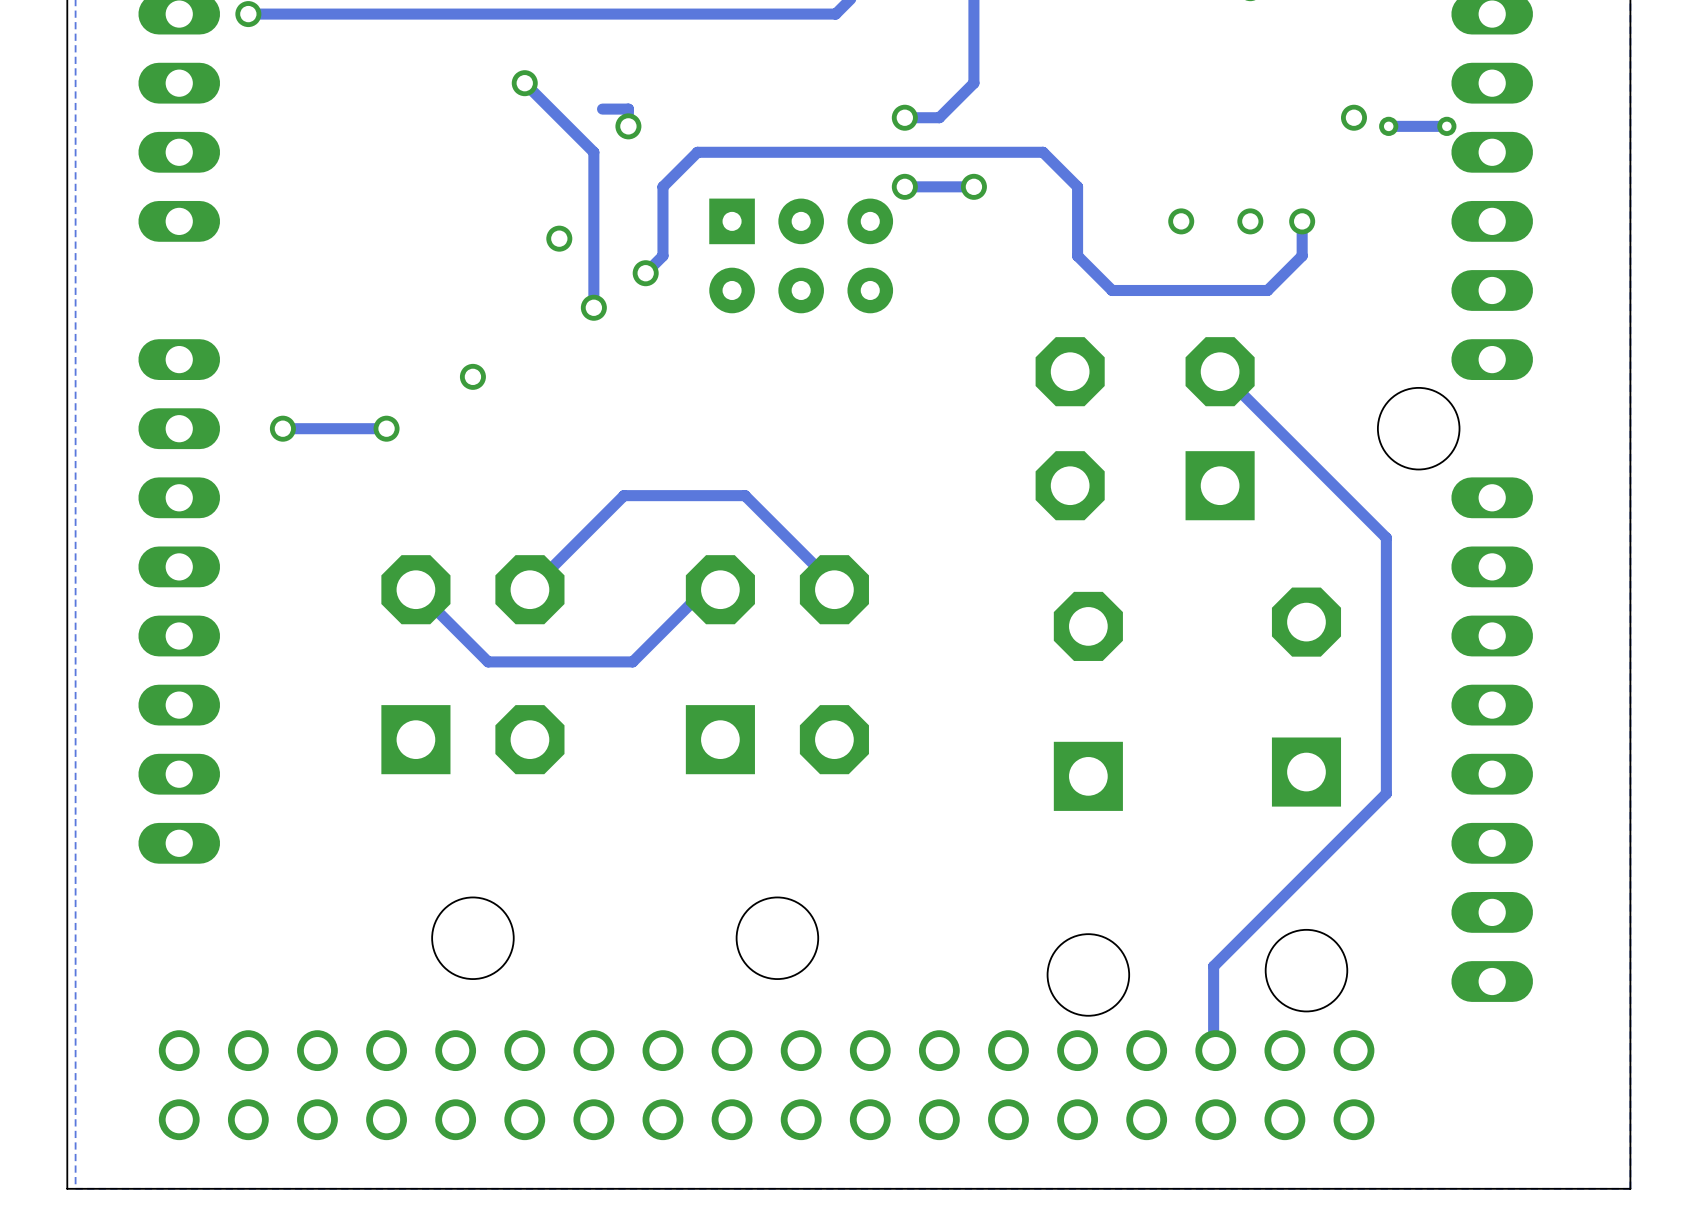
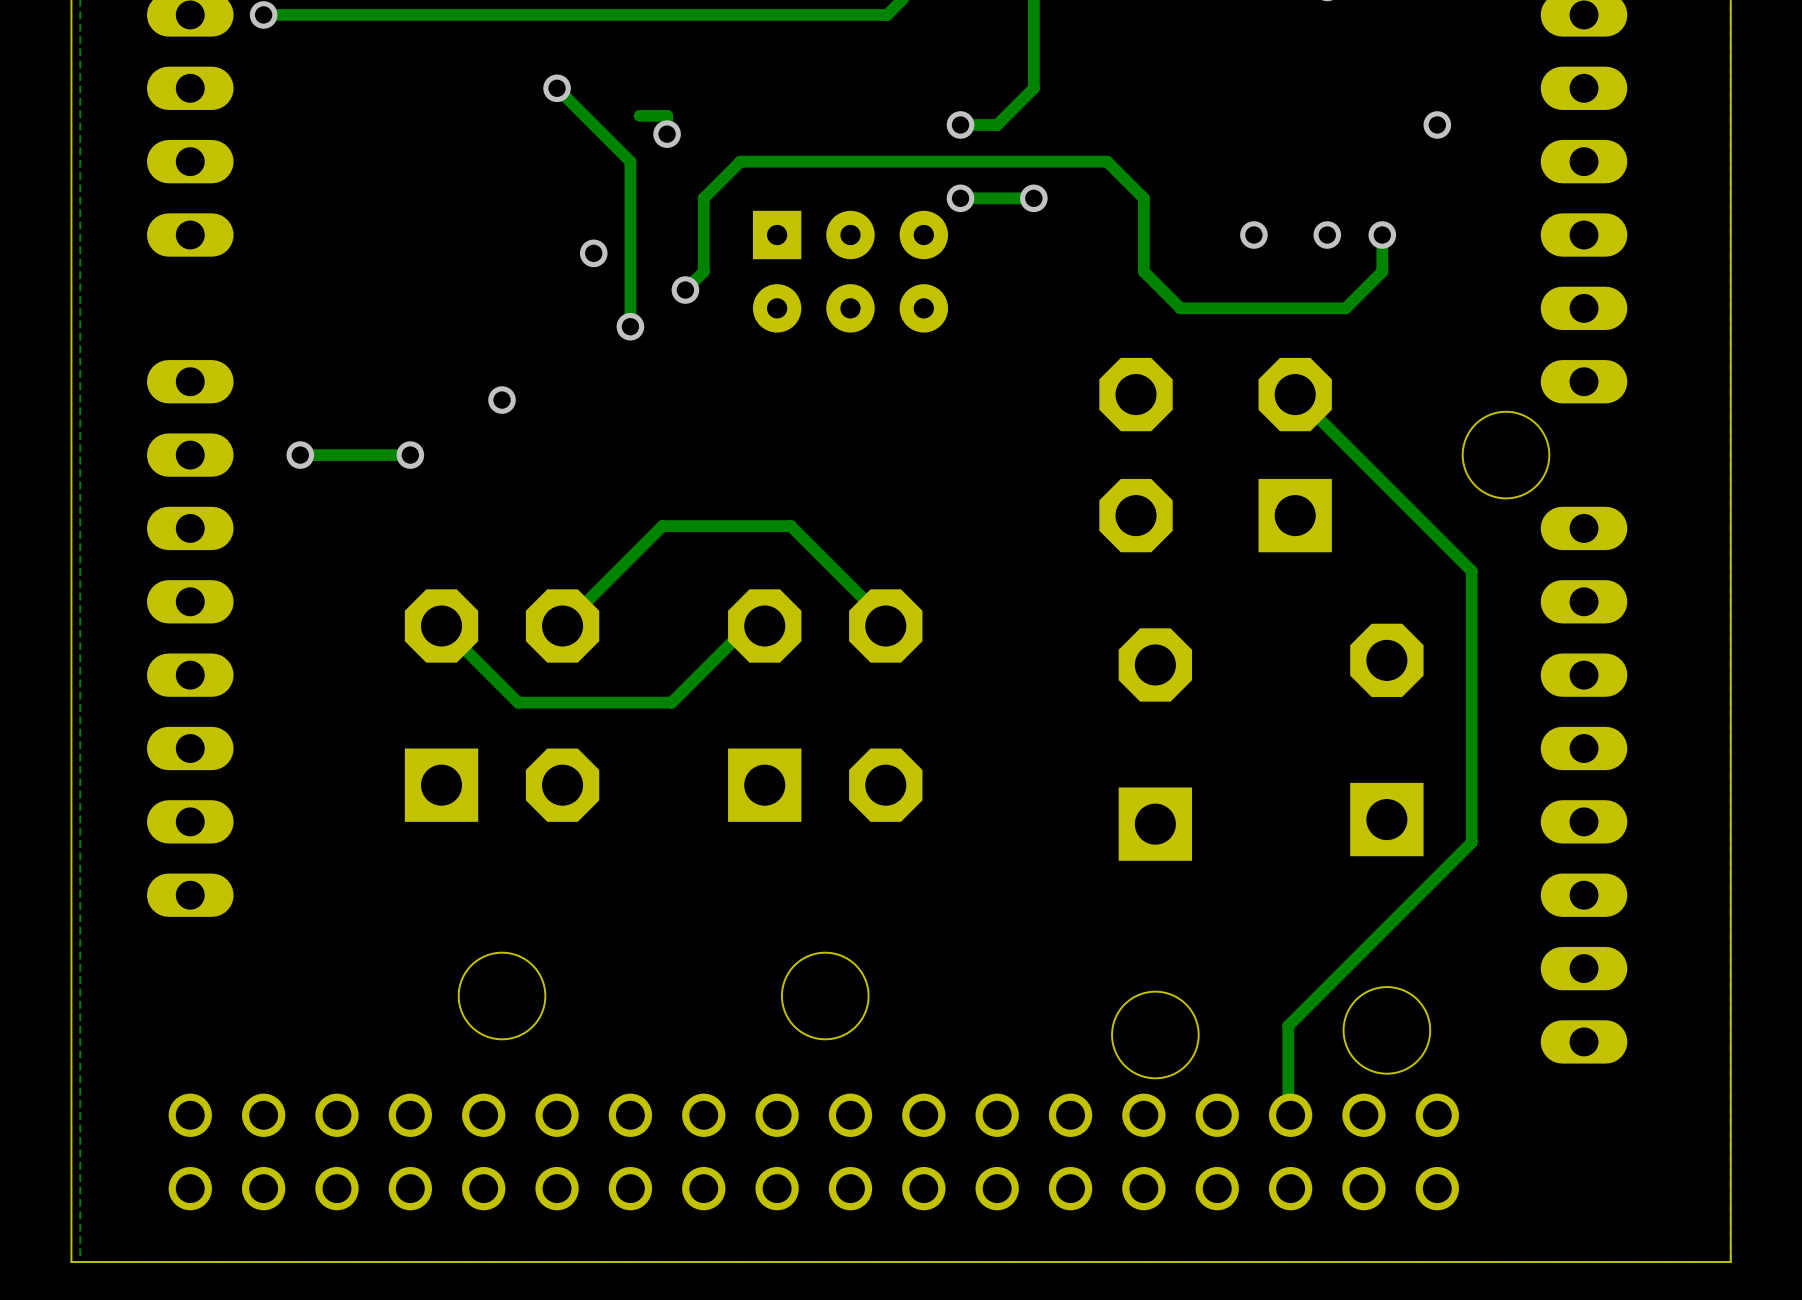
via: (1388, 126) -> none
track: (1446, 126) (1388, 126) -> none
via: (1446, 126) -> none

